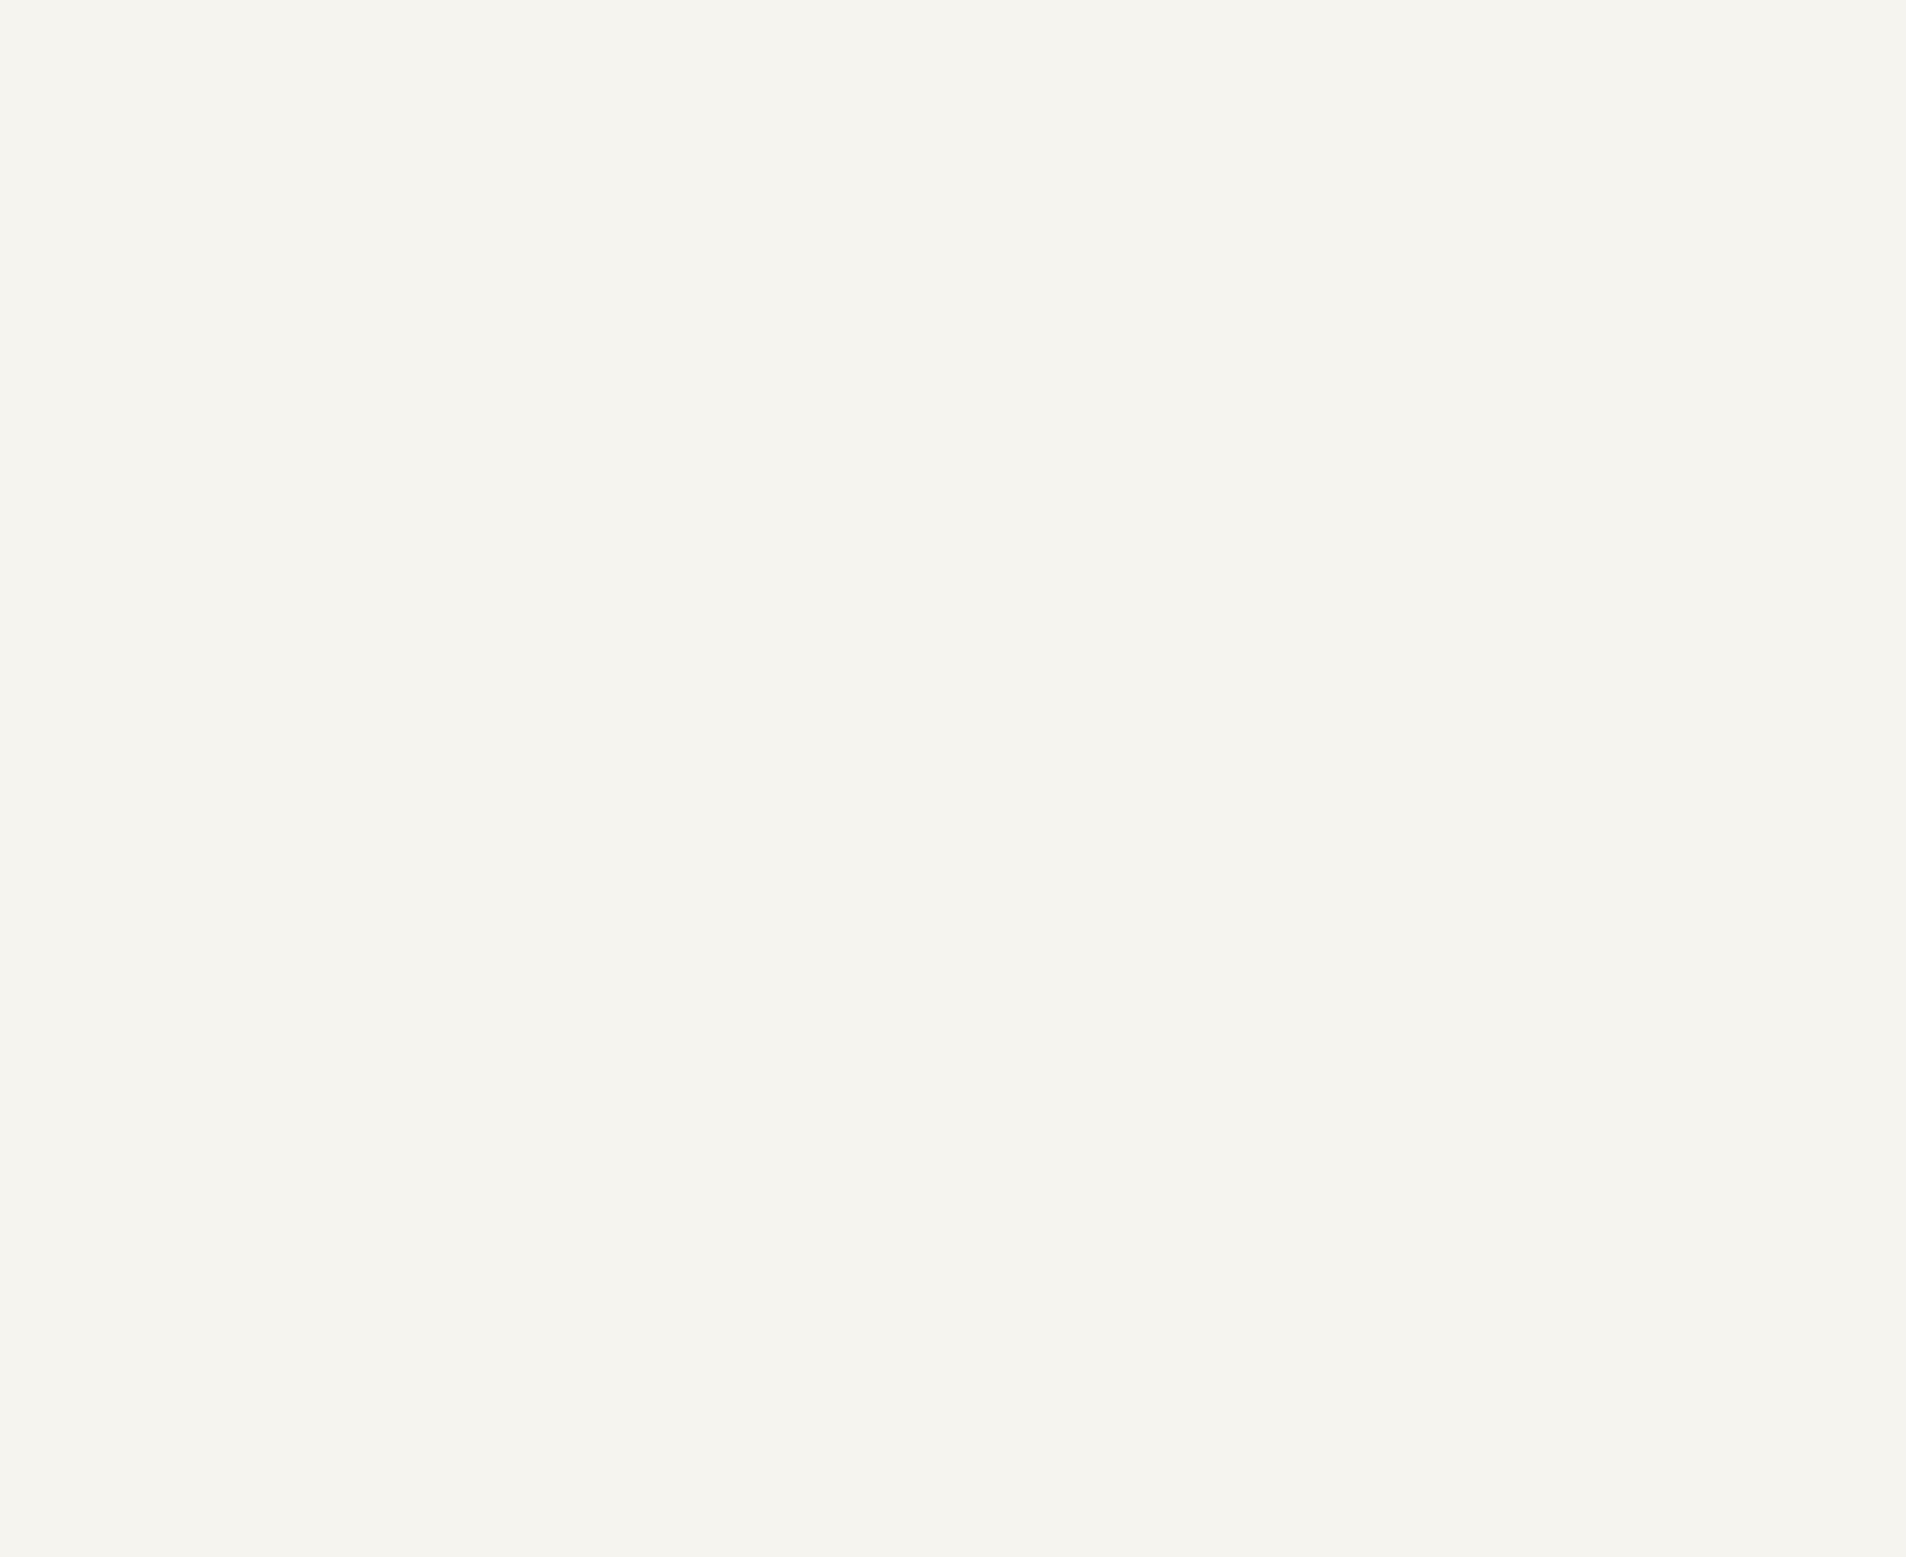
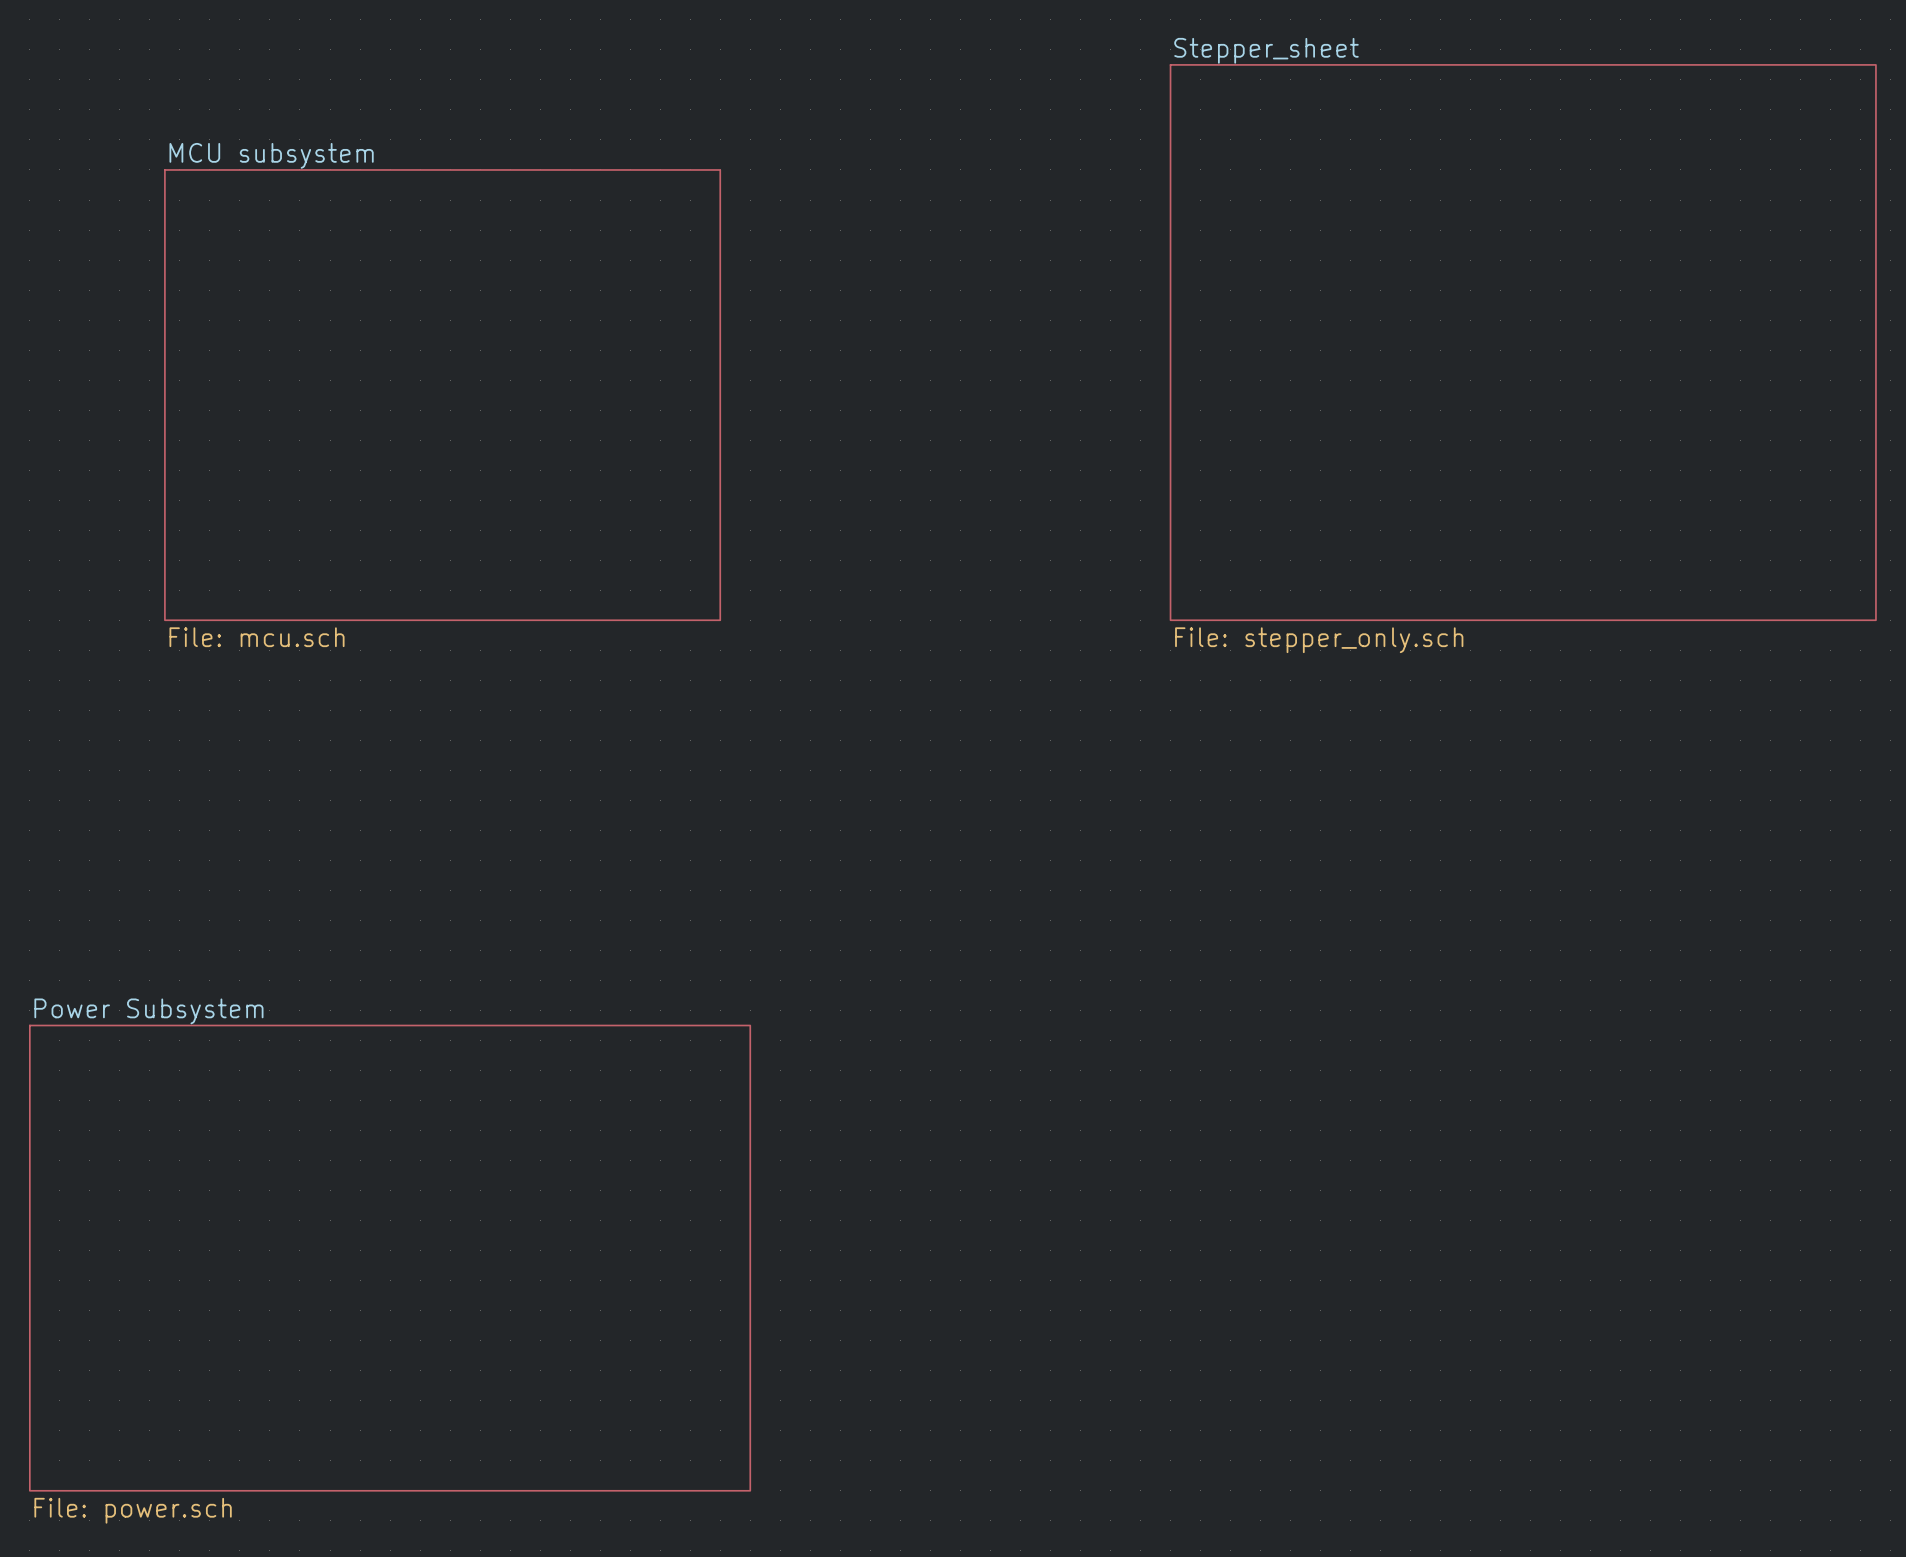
sheet Stepper_sheet: none -> File: stepper_only.sch (1523, 342)
sheet MCU subsystem: none -> File: mcu.sch (442, 395)
sheet Power Subsystem: none -> File: power.sch (390, 1258)

